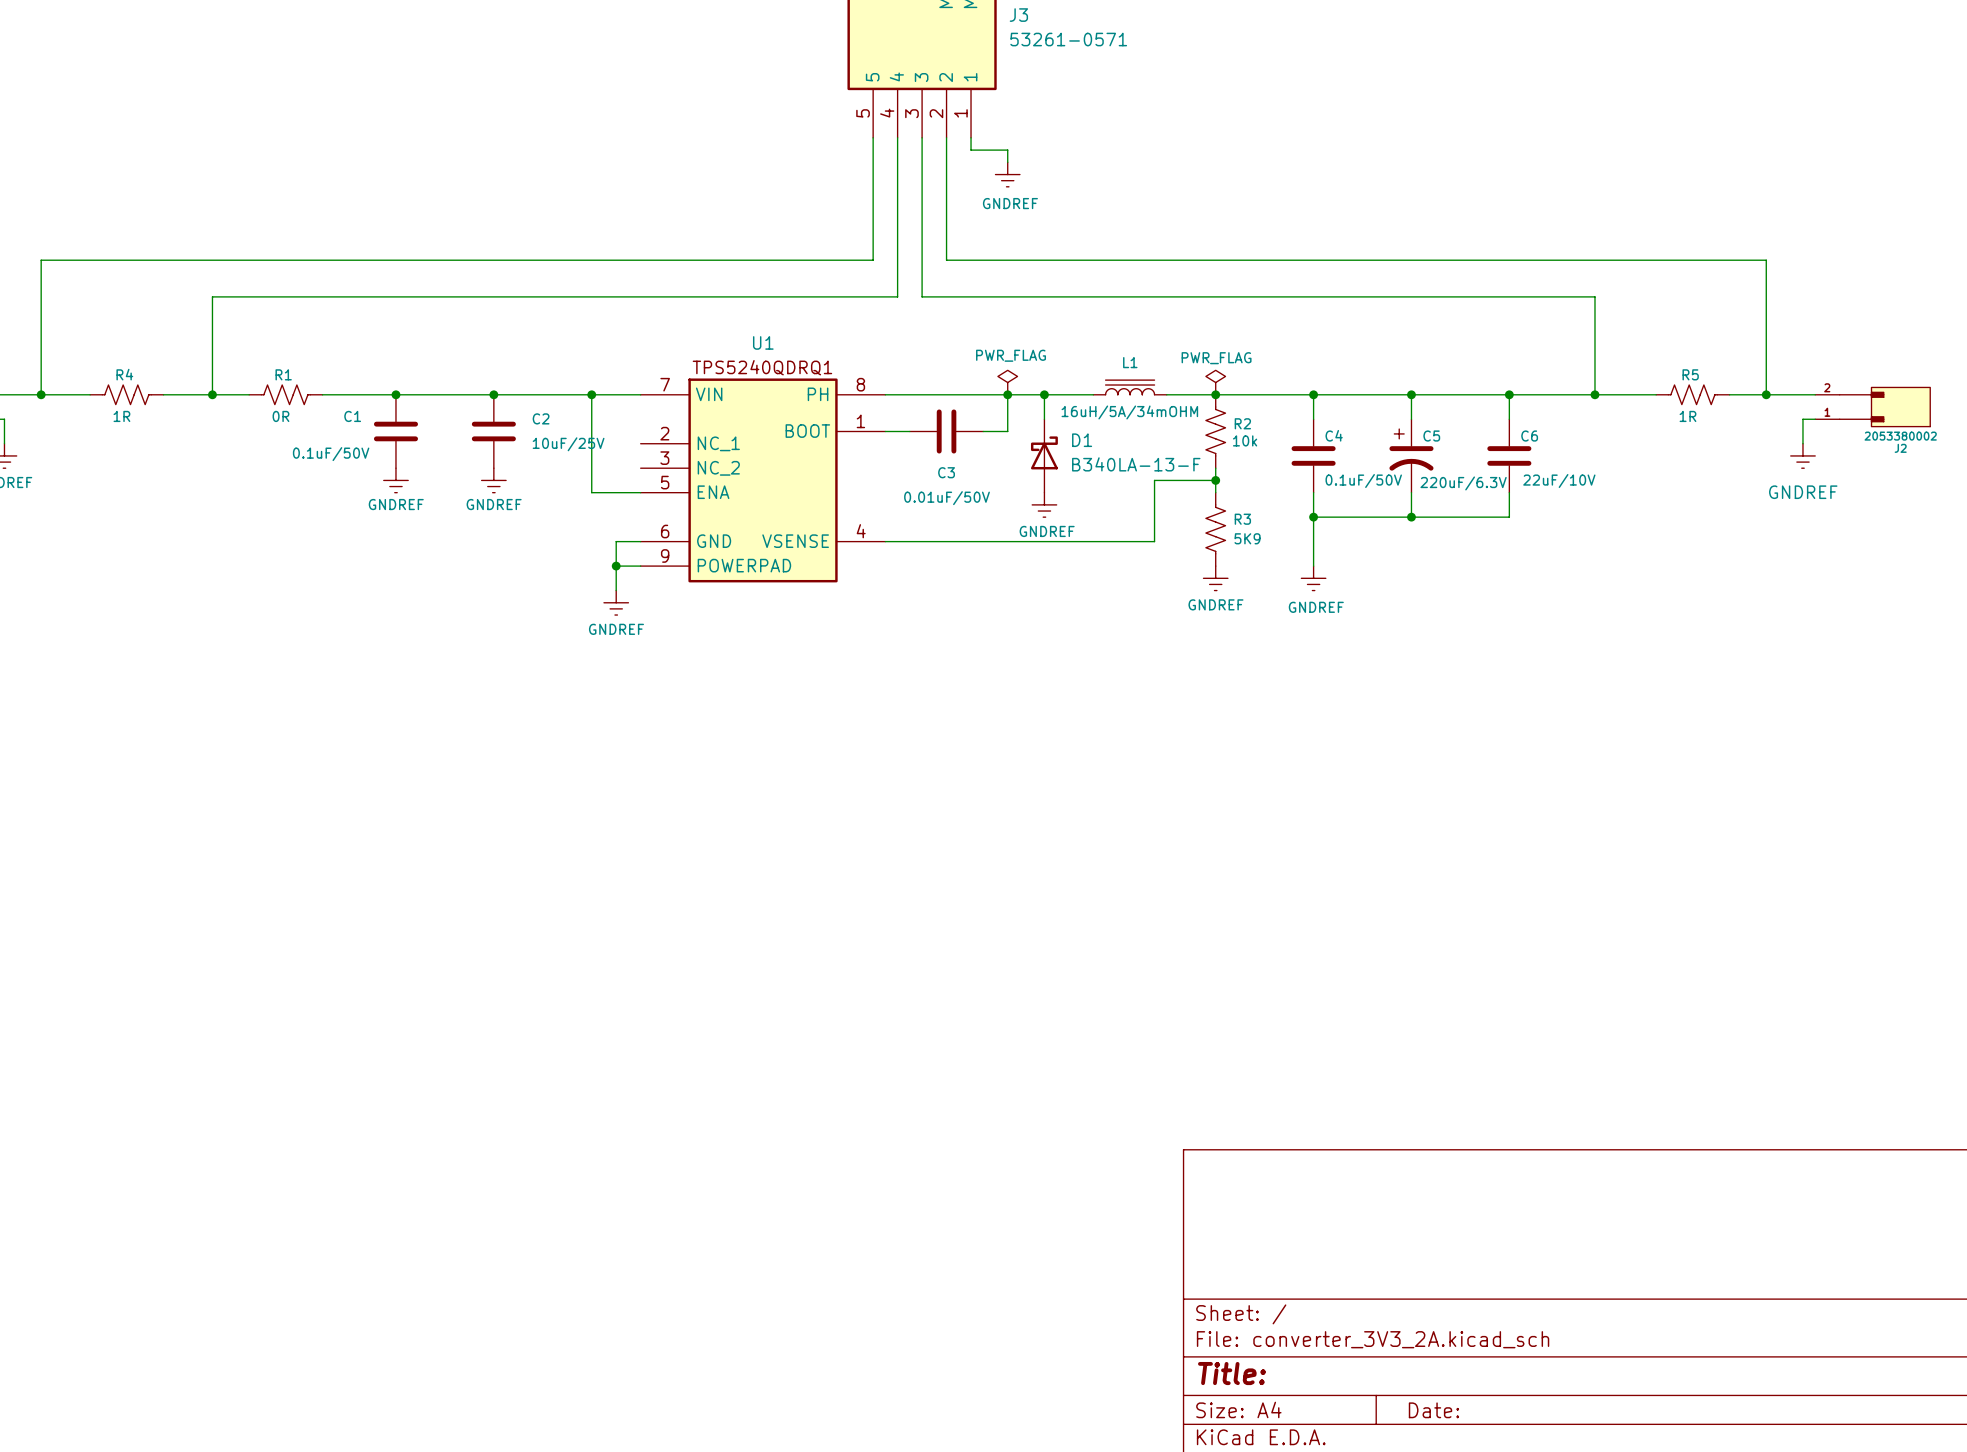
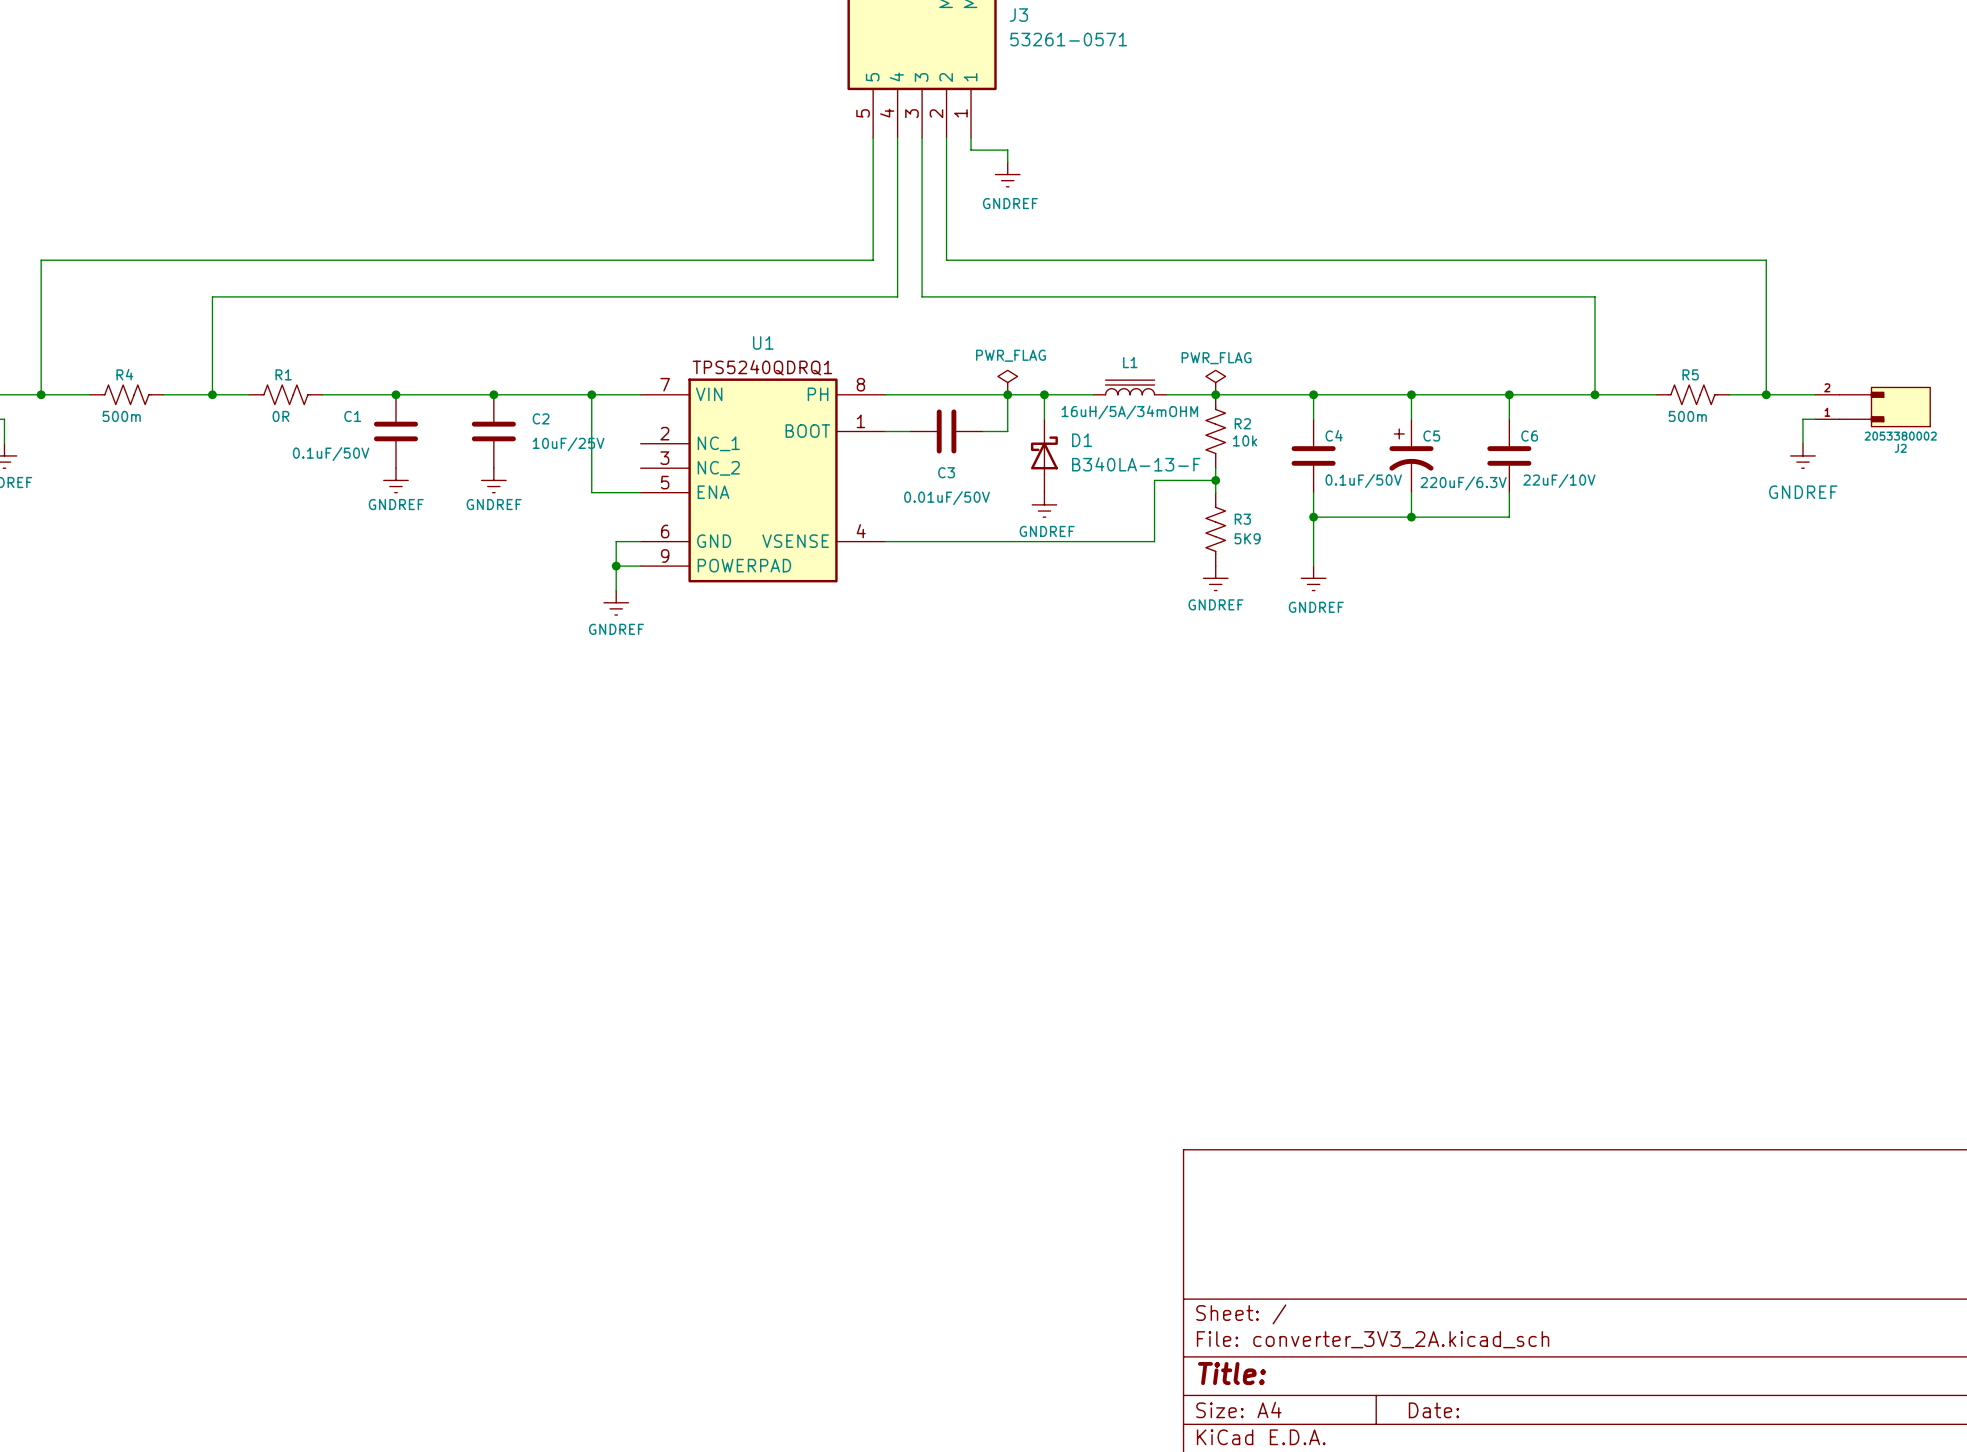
R4 value: 1R (121, 416) -> 500m (121, 416)
R5 value: 1R (1687, 416) -> 500m (1687, 416)

